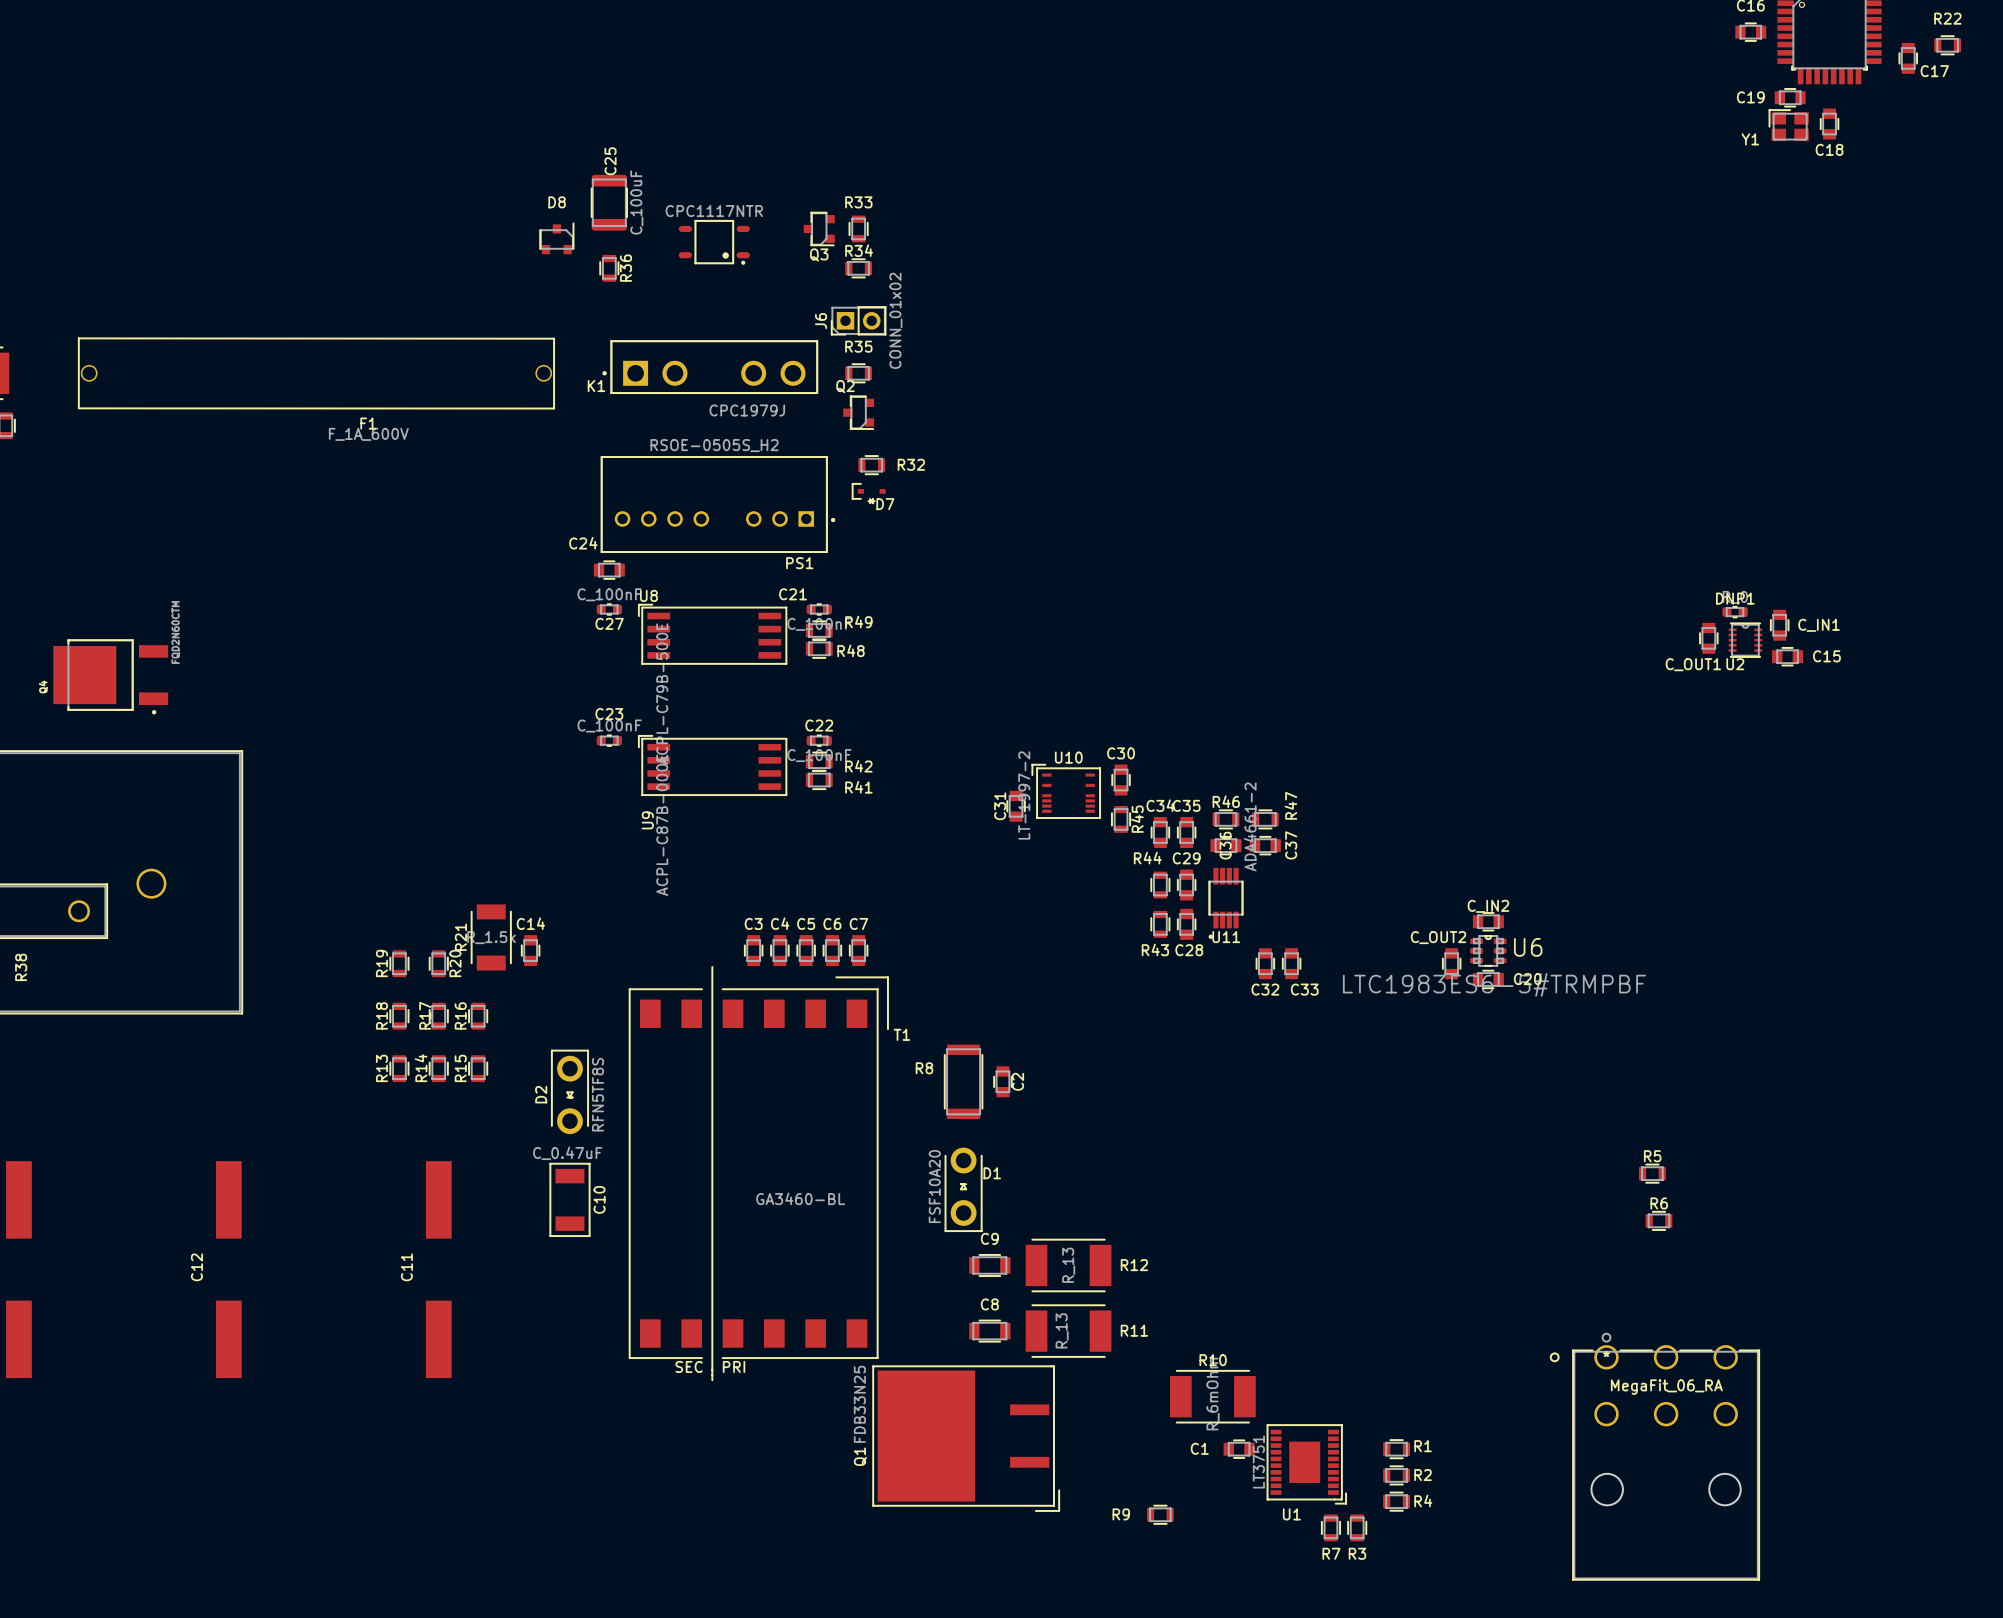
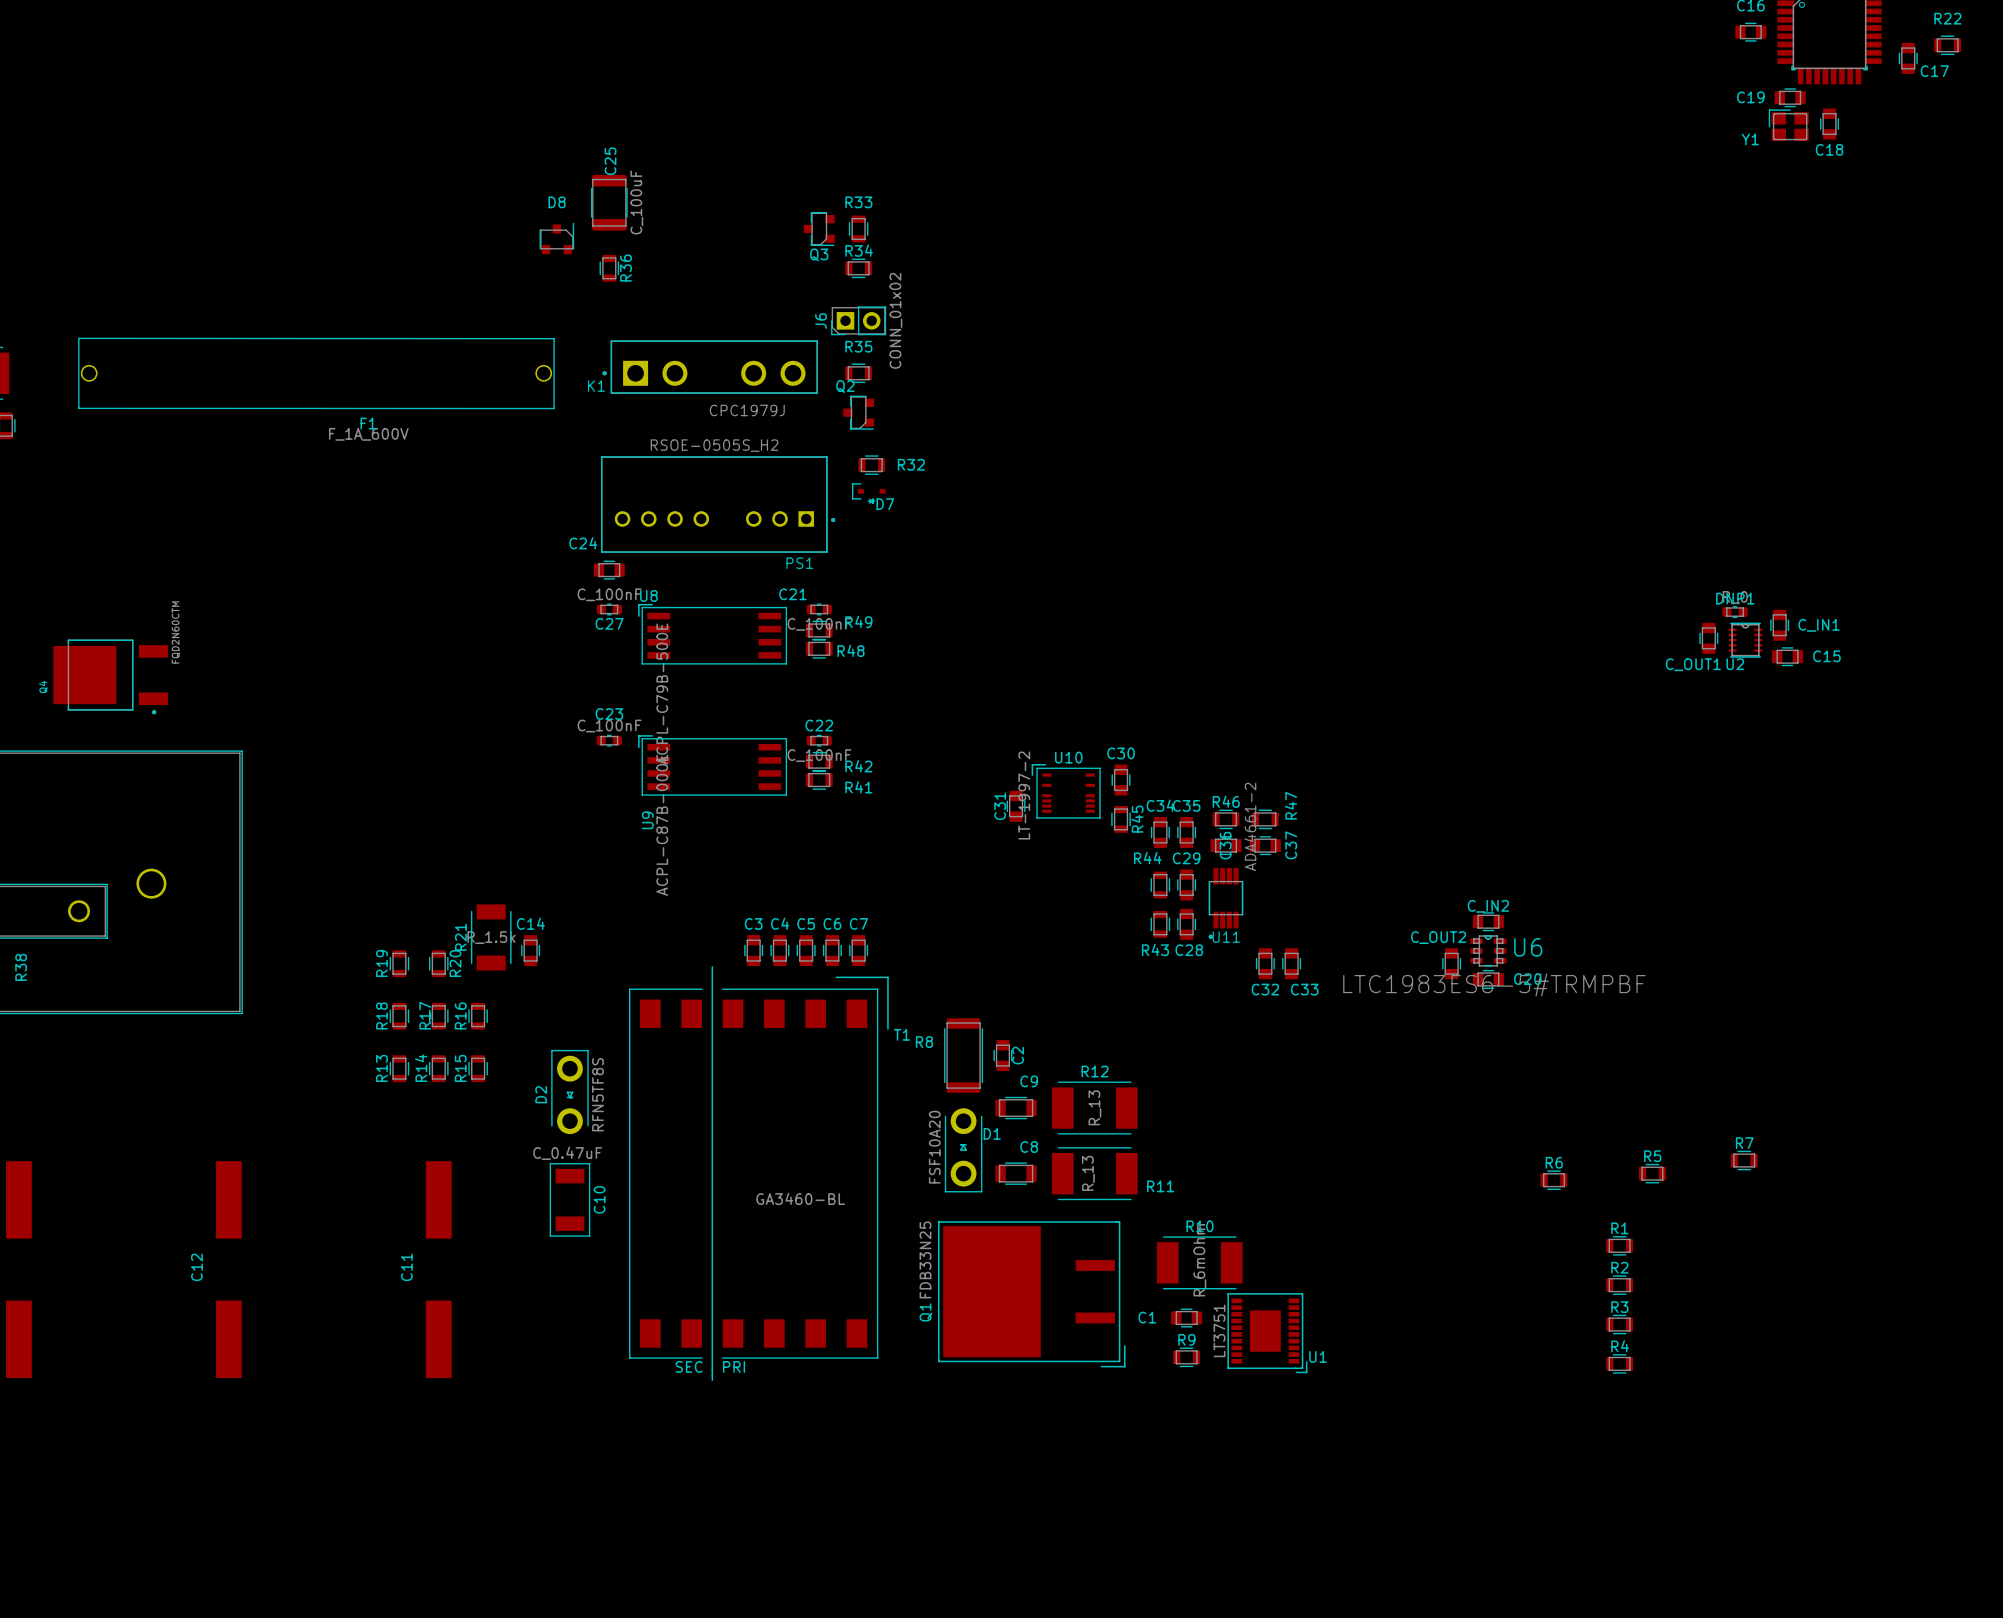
part: CPC1117NTR (714, 242) -> none
R8 position: (963, 1081) -> (963, 1055)
C2 position: (1002, 1081) -> (1002, 1055)
D1 position: (963, 1189) -> (963, 1150)
R6 position: (1658, 1220) -> (1554, 1180)
C9 name position: C9 (989, 1238) -> C9 (1029, 1081)
C9 position: (989, 1265) -> (1016, 1108)
R12 position: (1068, 1265) -> (1094, 1108)
R12 name position: R12 (1134, 1265) -> R12 (1095, 1071)
C8 name position: C8 (989, 1304) -> C8 (1029, 1147)
R11 name position: R11 (1134, 1330) -> R11 (1160, 1186)
C8 position: (989, 1331) -> (1016, 1173)
R11 position: (1068, 1331) -> (1094, 1173)
R10 position: (1212, 1396) -> (1199, 1262)
Q1 position: (966, 1438) -> (1031, 1294)
R1 name position: R1 (1423, 1446) -> R1 (1619, 1228)
C1 position: (1239, 1449) -> (1186, 1317)
R1 position: (1396, 1449) -> (1619, 1245)
part: MegaFit_06_RA (1654, 1456) -> none
U1 position: (1306, 1464) -> (1267, 1333)
R2 position: (1396, 1475) -> (1619, 1285)
R2 name position: R2 (1423, 1475) -> R2 (1619, 1267)
R4 position: (1396, 1501) -> (1619, 1363)
R4 name position: R4 (1423, 1501) -> R4 (1620, 1346)
R9 name position: R9 (1121, 1514) -> R9 (1186, 1339)
R9 position: (1160, 1514) -> (1186, 1357)
U1 name position: U1 (1291, 1514) -> U1 (1318, 1356)
R7 rotation: 0° (1330, 1527) -> 90° clockwise (1744, 1160)
R7 position: (1330, 1527) -> (1744, 1160)
R3 rotation: 0° (1357, 1527) -> 90° clockwise (1619, 1324)
R3 position: (1357, 1527) -> (1619, 1324)
R7 name position: R7 (1331, 1553) -> R7 (1744, 1143)
R3 name position: R3 (1357, 1553) -> R3 (1619, 1307)

